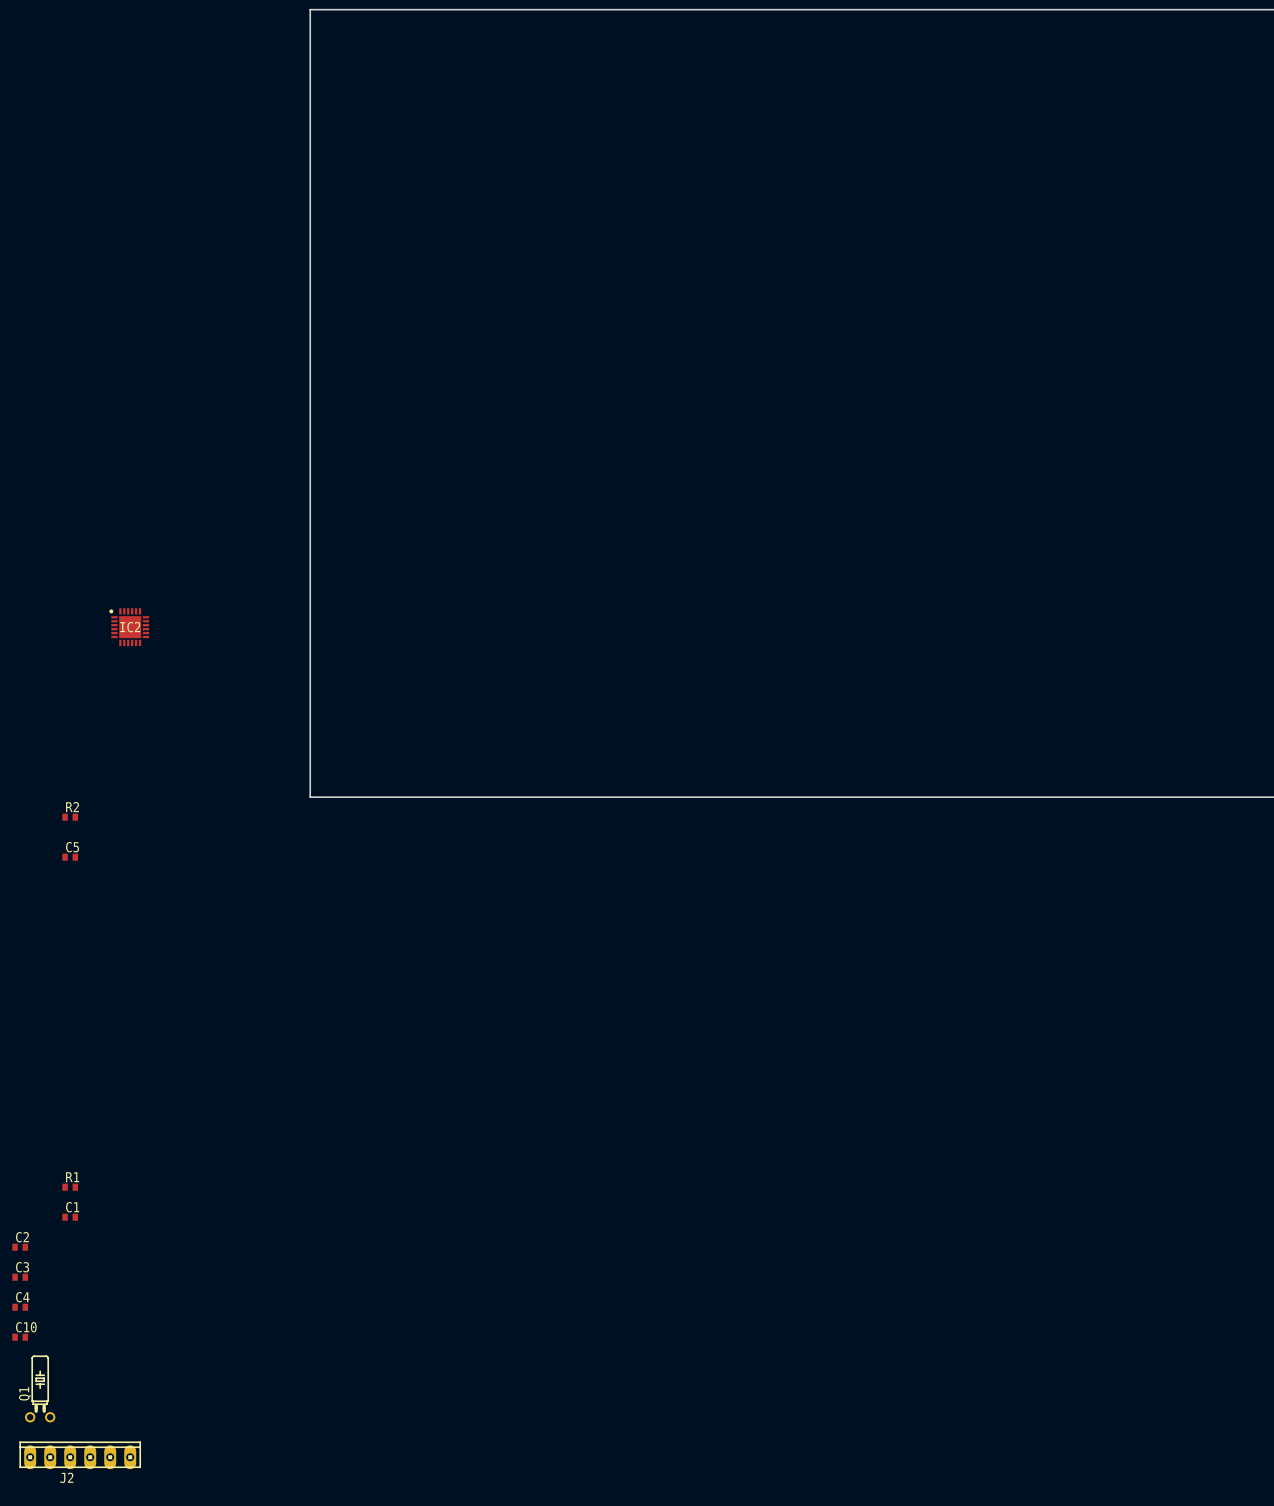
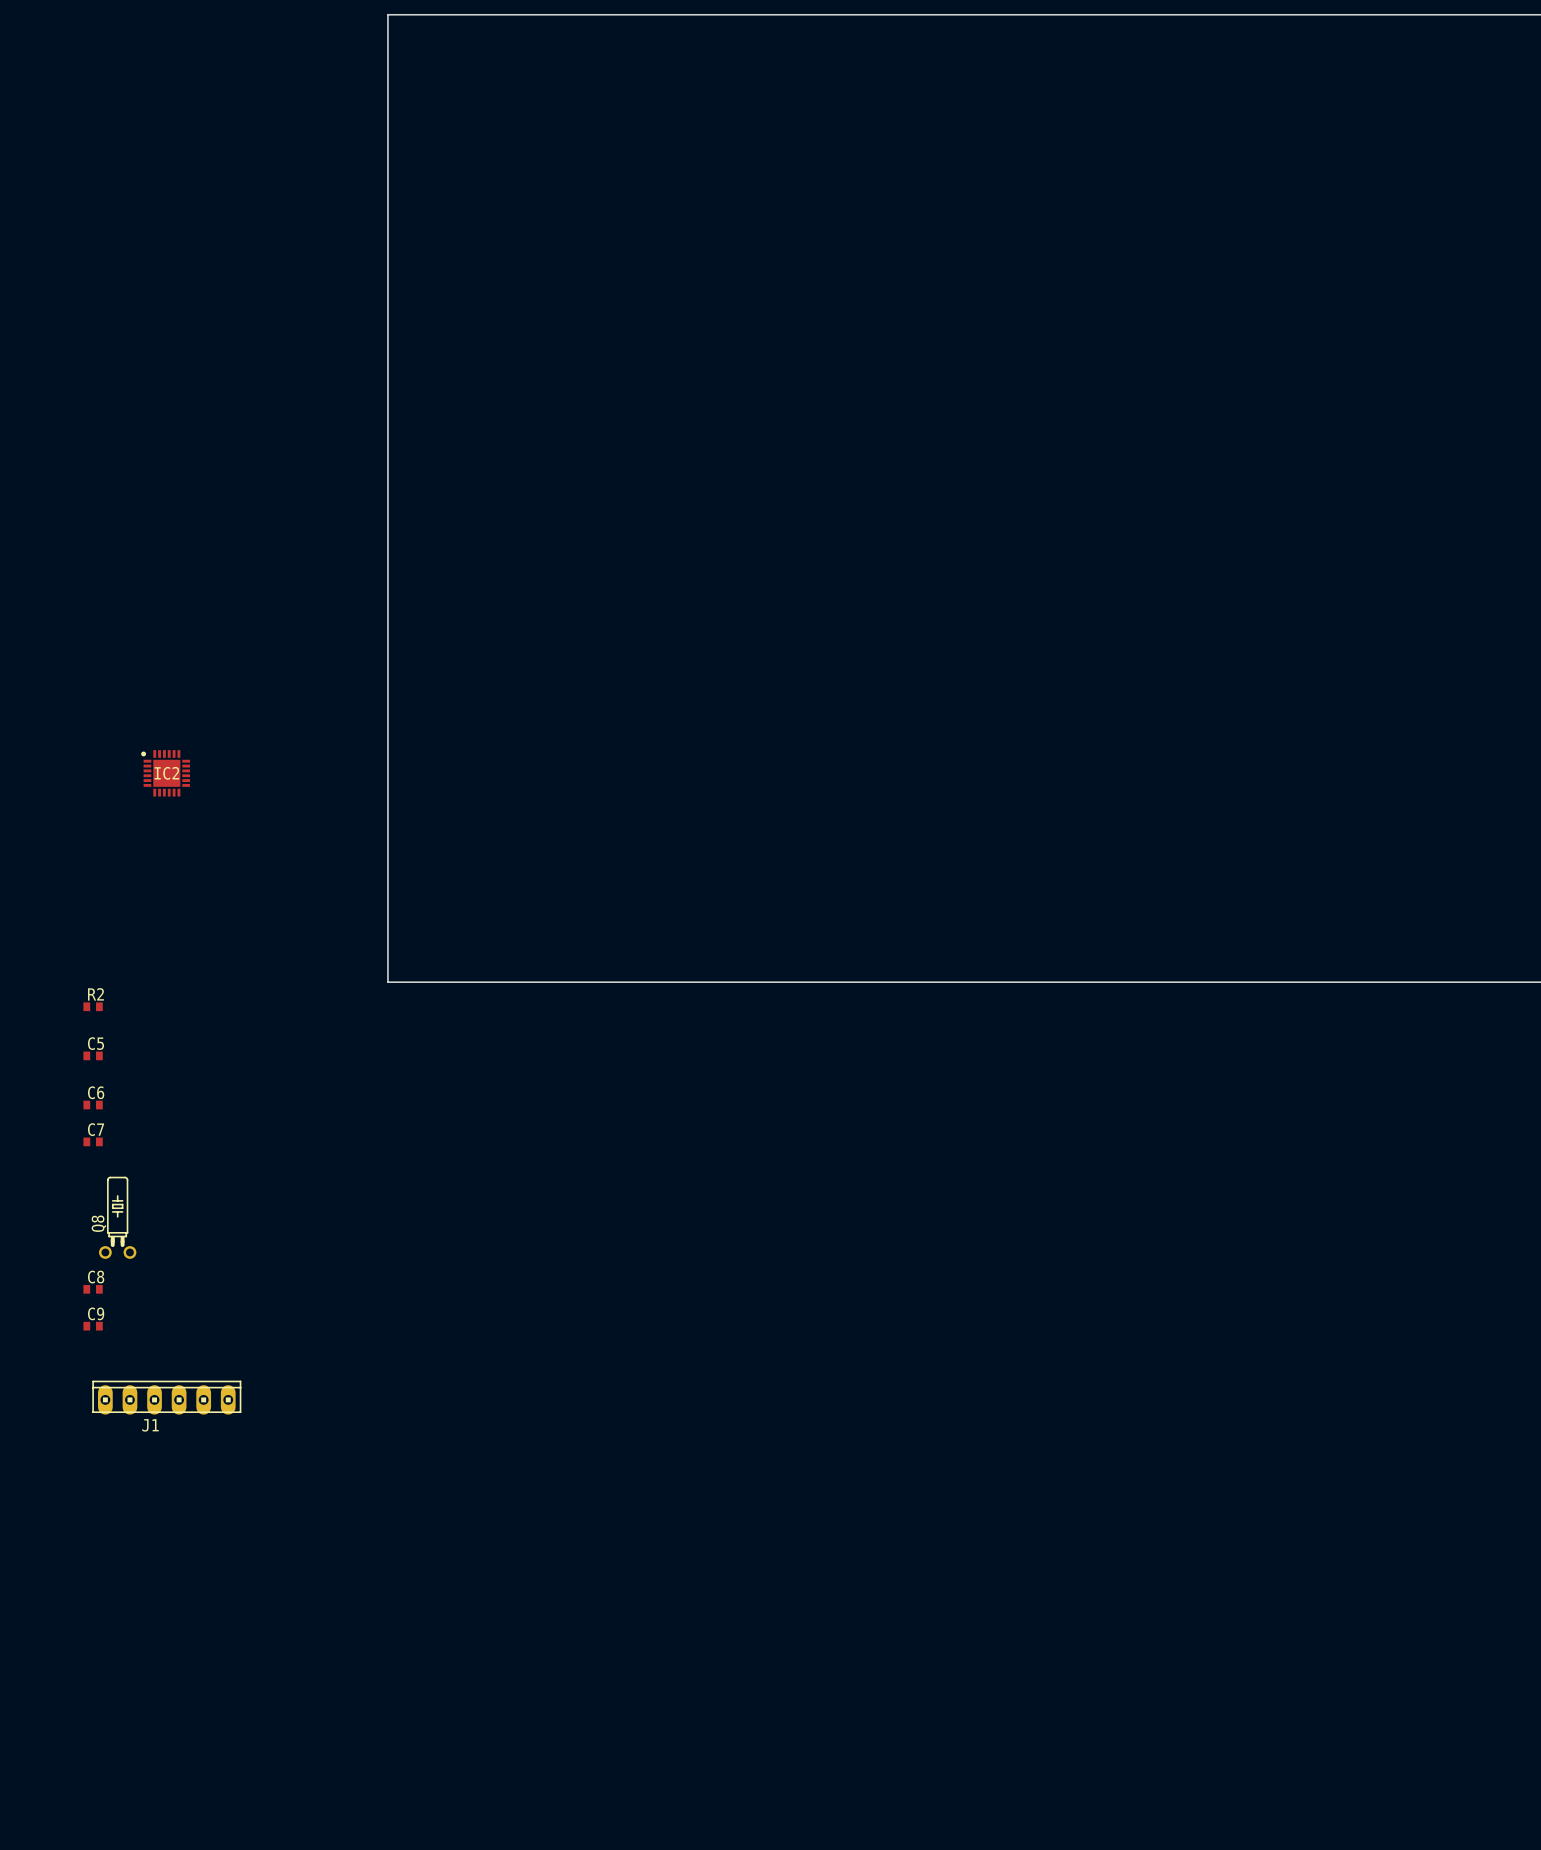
C6: none -> (93, 1105)
C7: none -> (93, 1141)
Q8: none -> (117, 1217)
C8: none -> (93, 1289)
C9: none -> (93, 1326)
J1: none -> (166, 1397)
R1: (70, 1187) -> none
C1: (70, 1217) -> none
C2: (20, 1247) -> none
C3: (20, 1277) -> none
C4: (20, 1307) -> none
C10: (20, 1337) -> none
Q1: (40, 1389) -> none
J2: (80, 1455) -> none

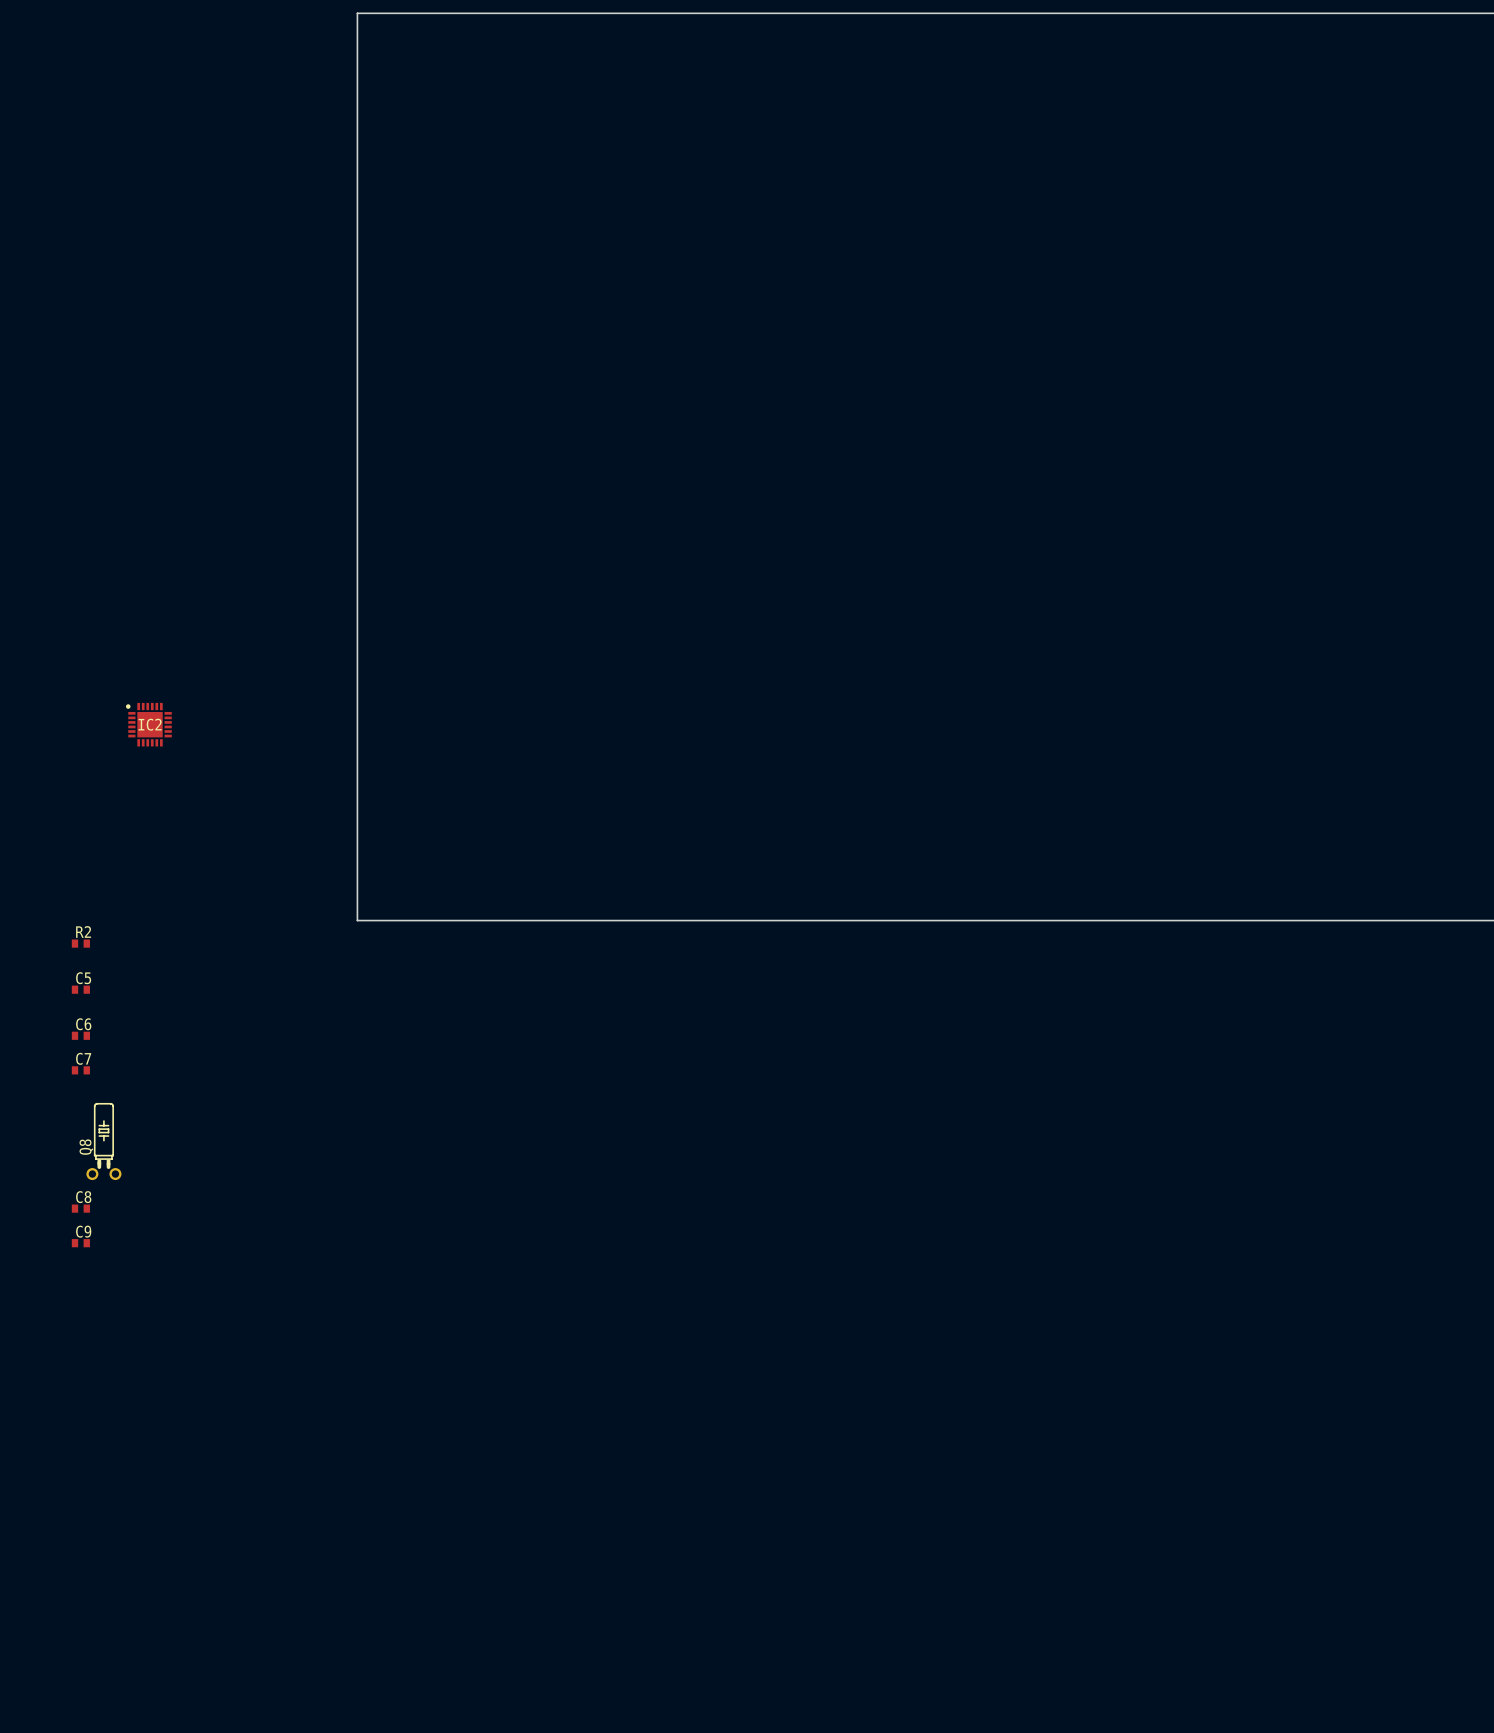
J1: (166, 1397) -> none

